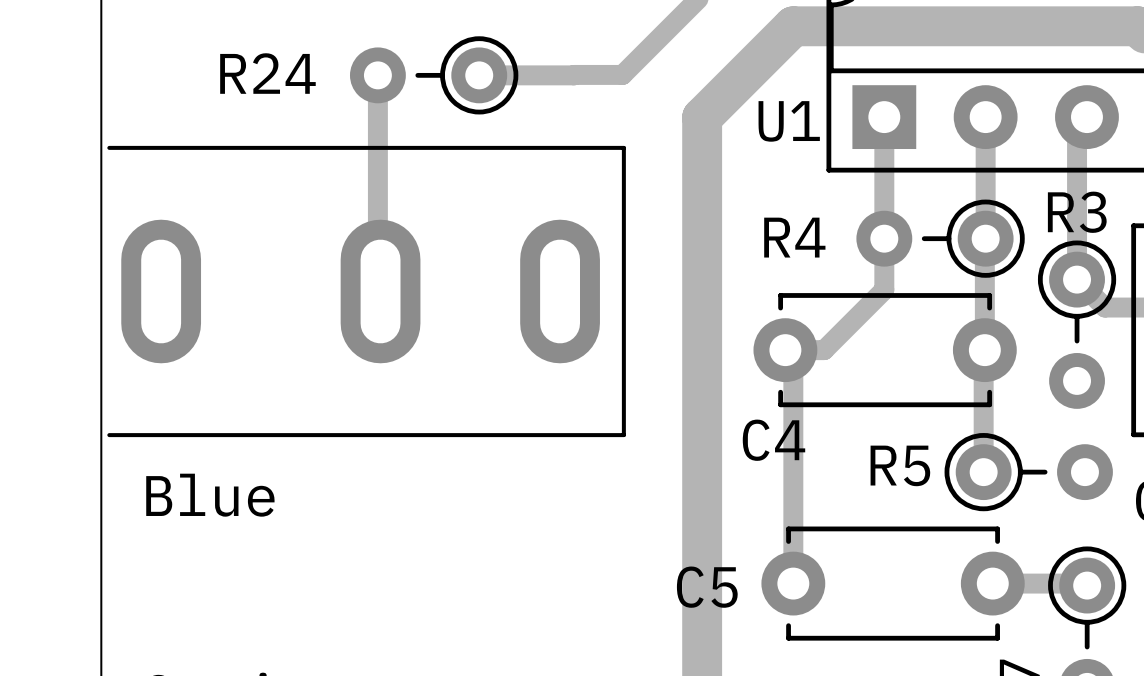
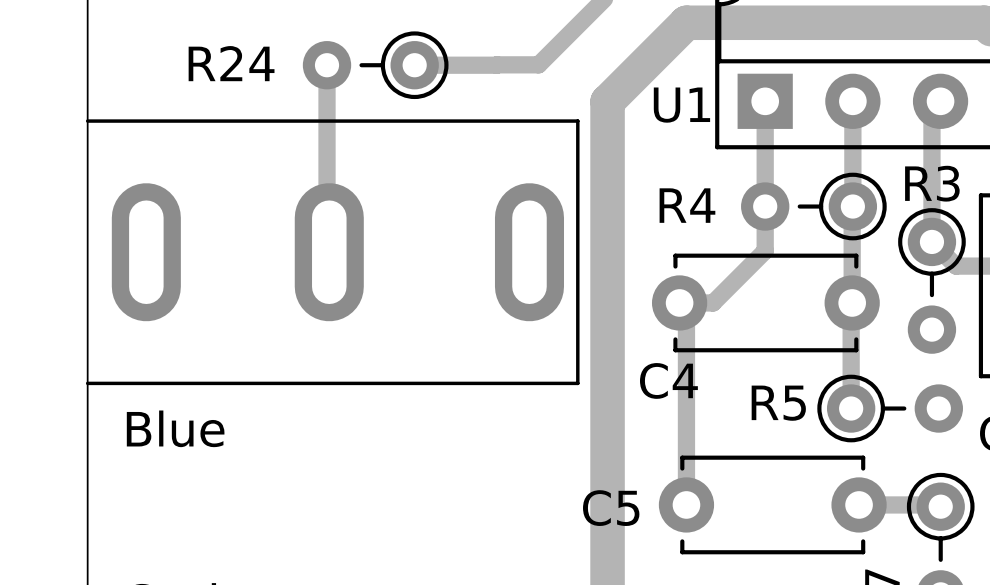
part footprint: [107, 145, 626, 438] -> [85, 119, 580, 386]

